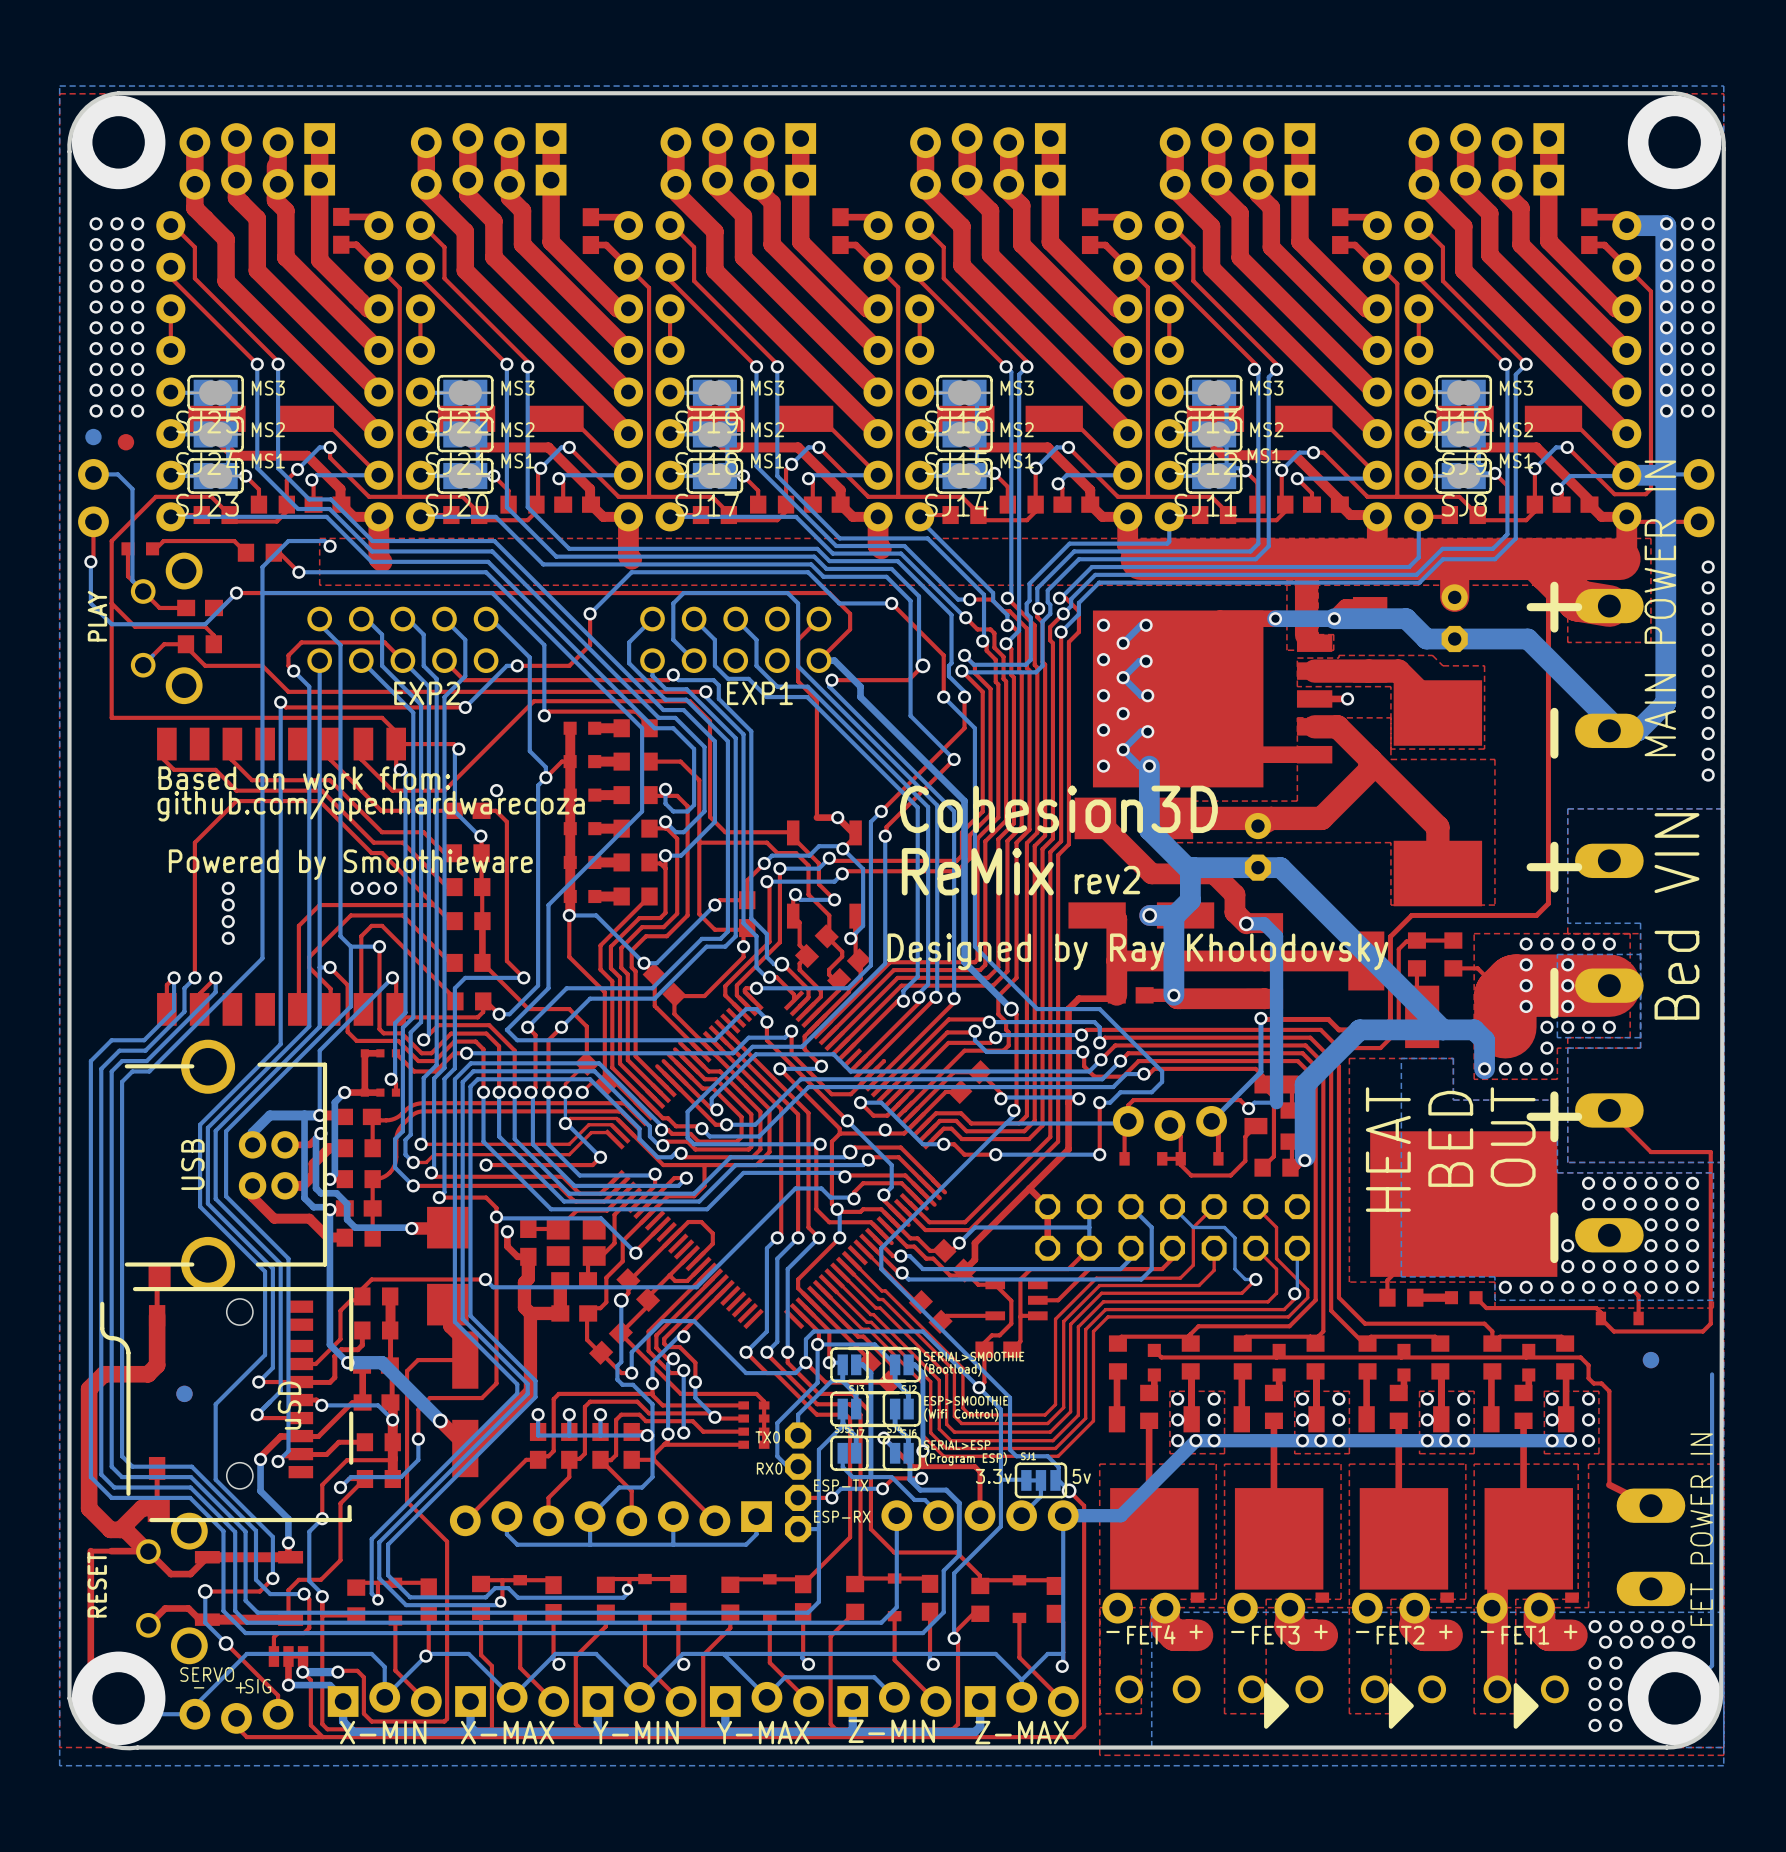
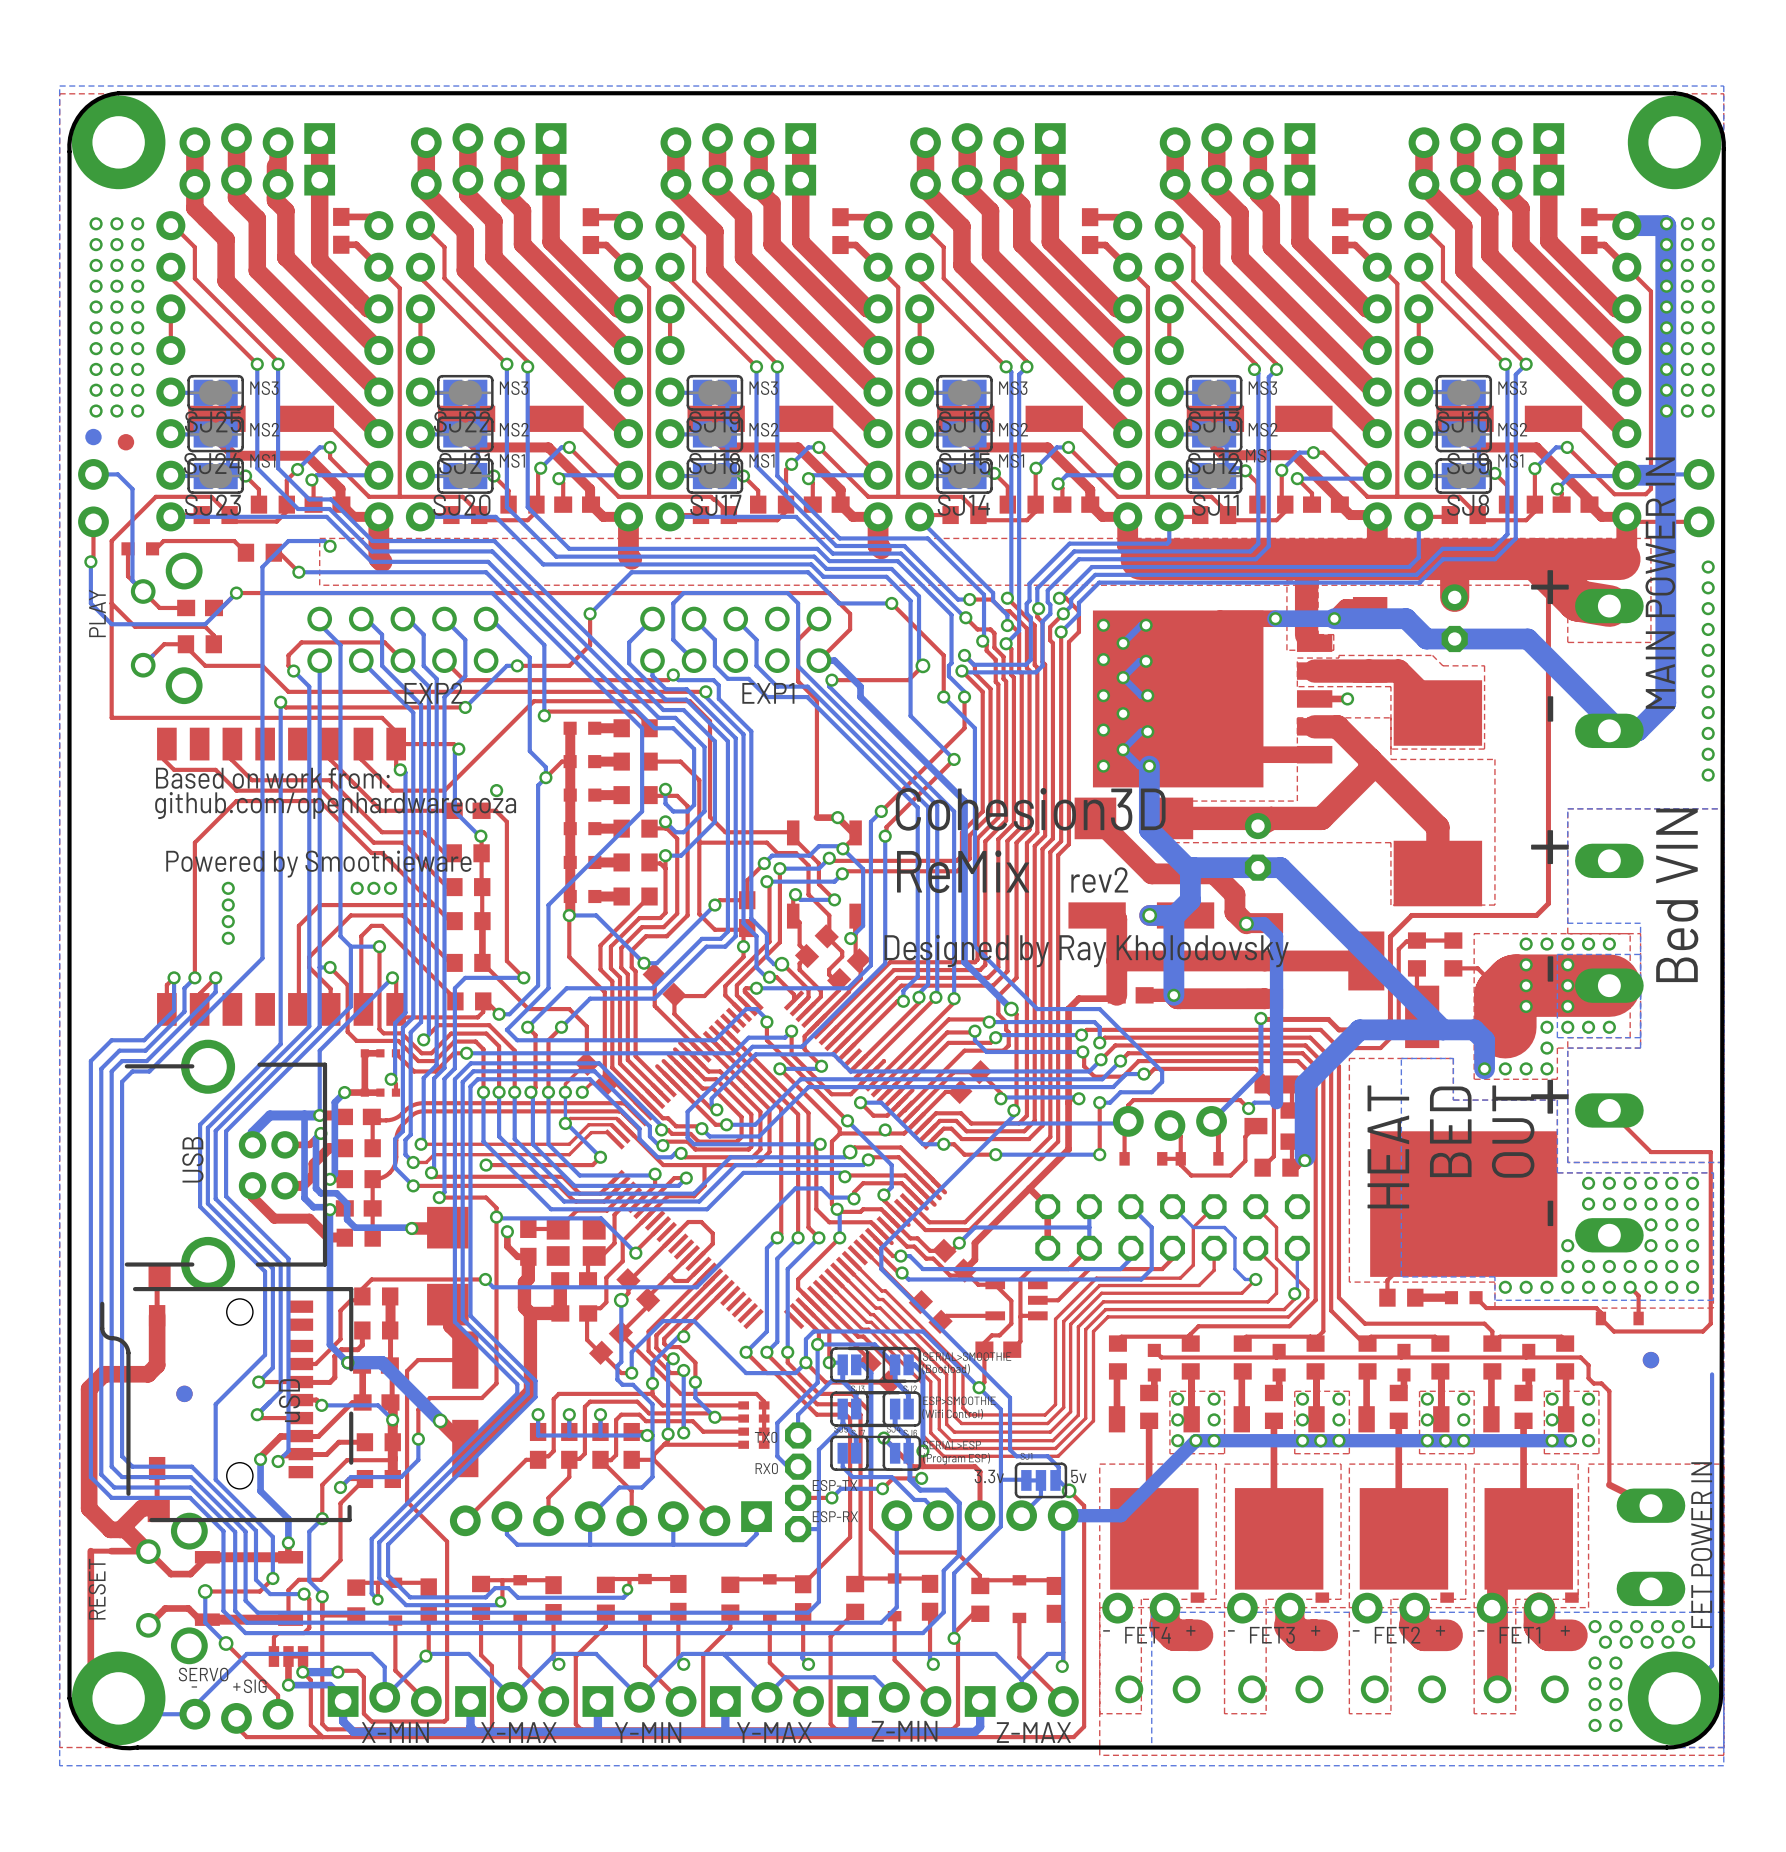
drawing: [1264, 1683, 1290, 1729] -> none
drawing: [1388, 1683, 1414, 1729] -> none
drawing: [1513, 1683, 1539, 1729] -> none

